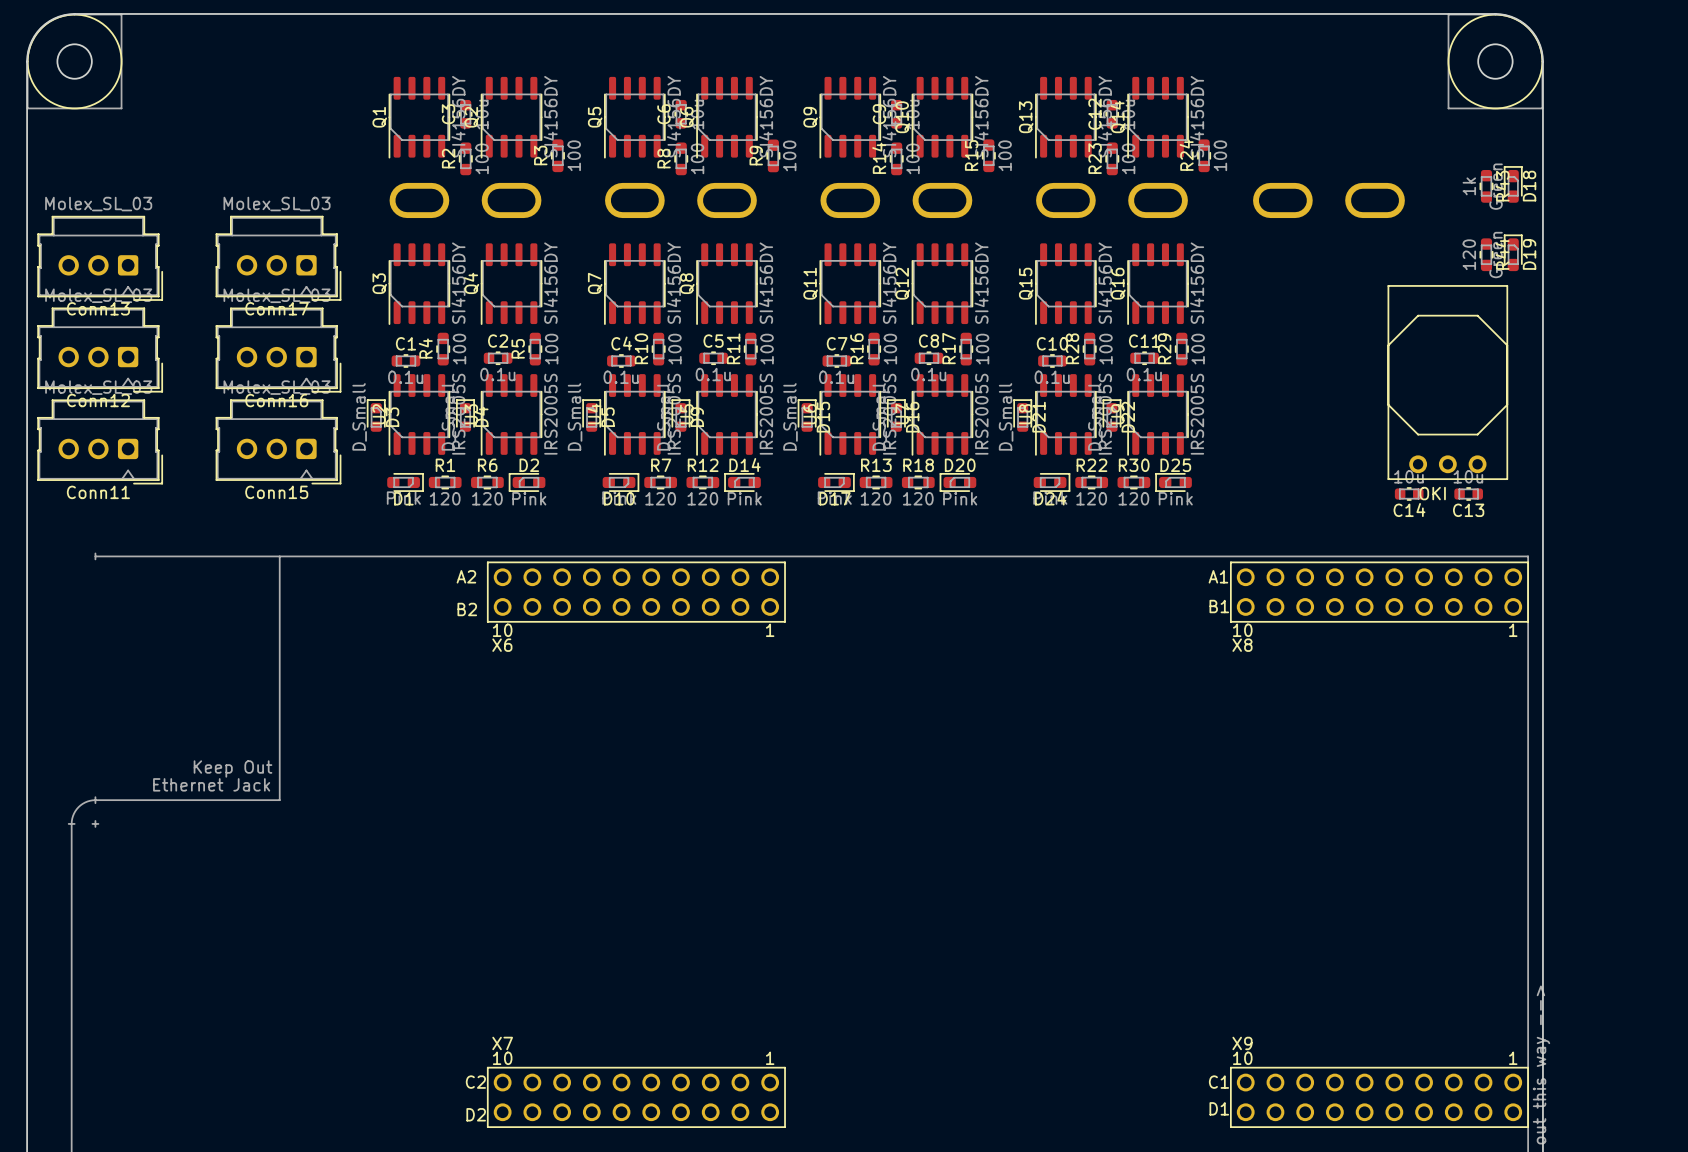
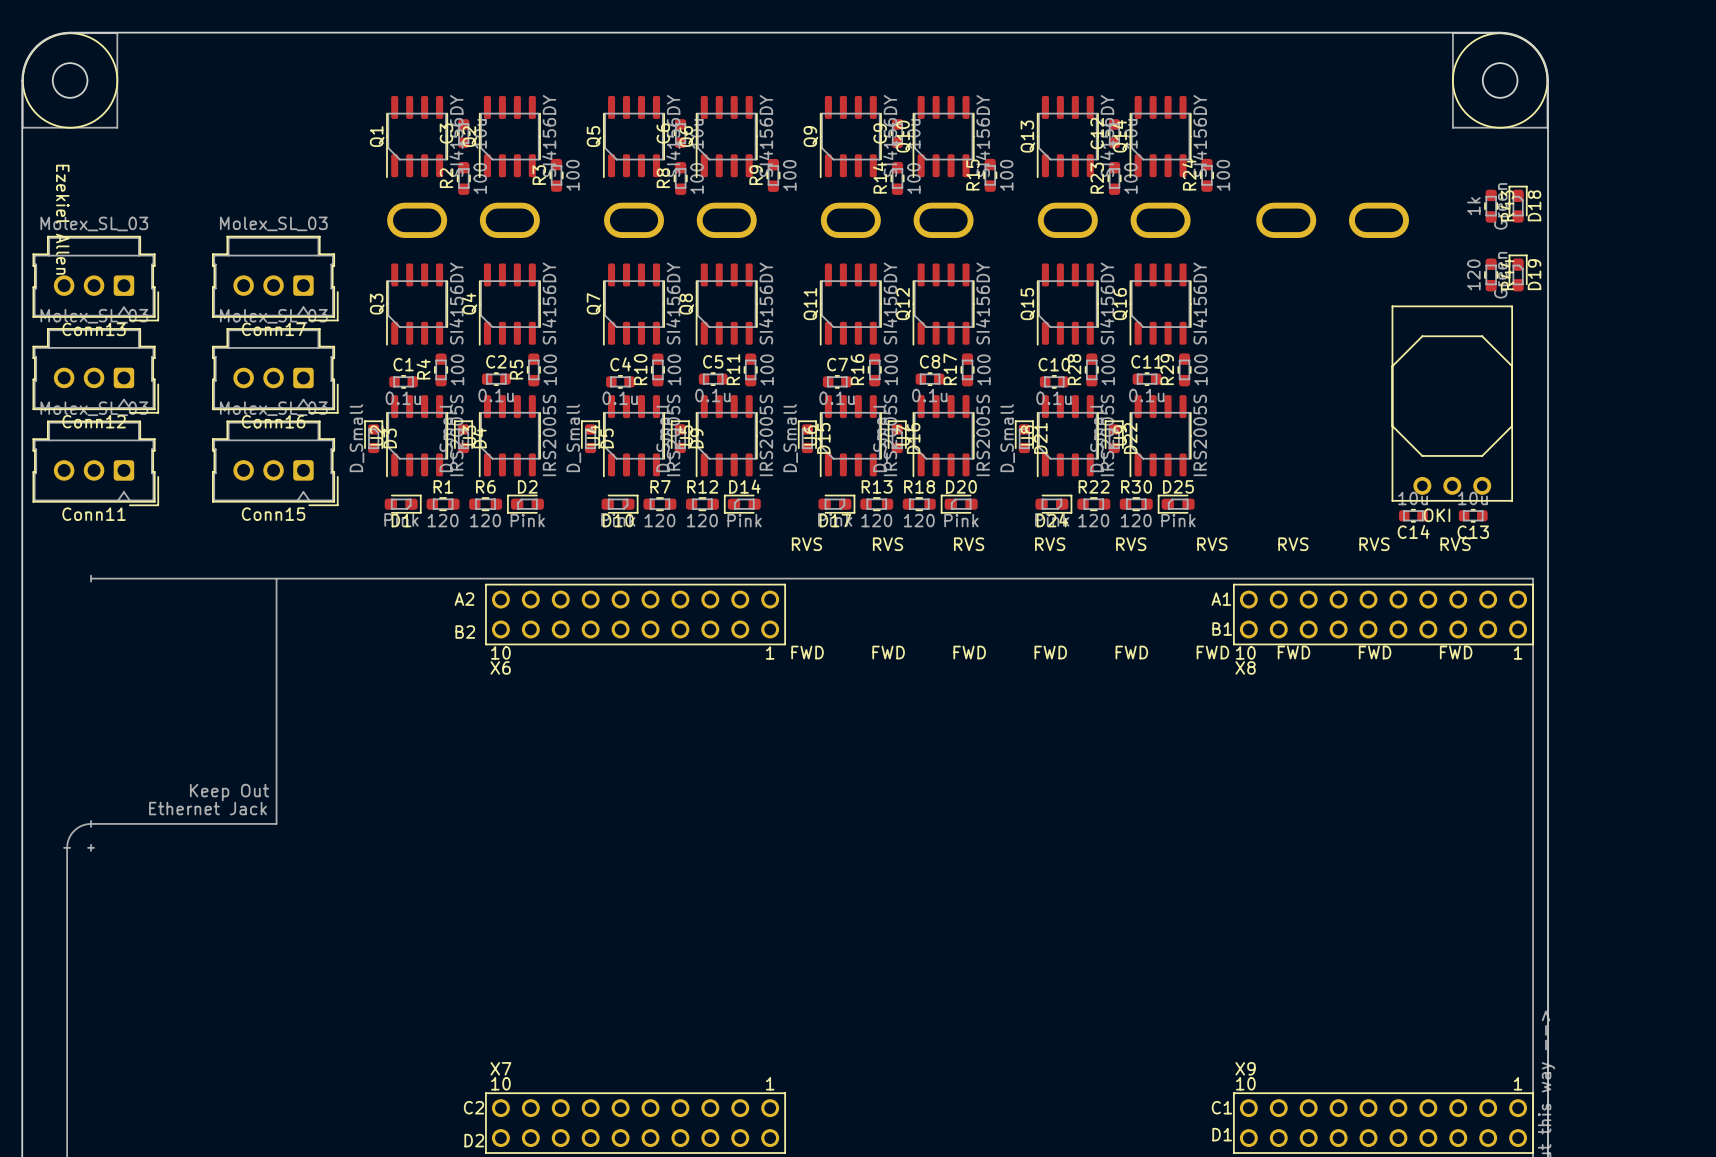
text: none -> Ezekiel Allen (62, 219)
text: none -> RVS (806, 544)
text: none -> RVS (888, 544)
text: none -> RVS (969, 544)
text: none -> RVS (1050, 544)
text: none -> RVS (1131, 544)
text: none -> RVS (1212, 544)
text: none -> RVS (1293, 544)
text: none -> RVS (1374, 544)
text: none -> RVS (1455, 544)
text: none -> FWD (807, 652)
text: none -> FWD (888, 652)
text: none -> FWD (969, 652)
text: none -> FWD (1050, 652)
text: none -> FWD (1131, 652)
text: none -> FWD (1212, 652)
text: none -> FWD (1293, 652)
text: none -> FWD (1375, 652)
text: none -> FWD (1456, 652)

